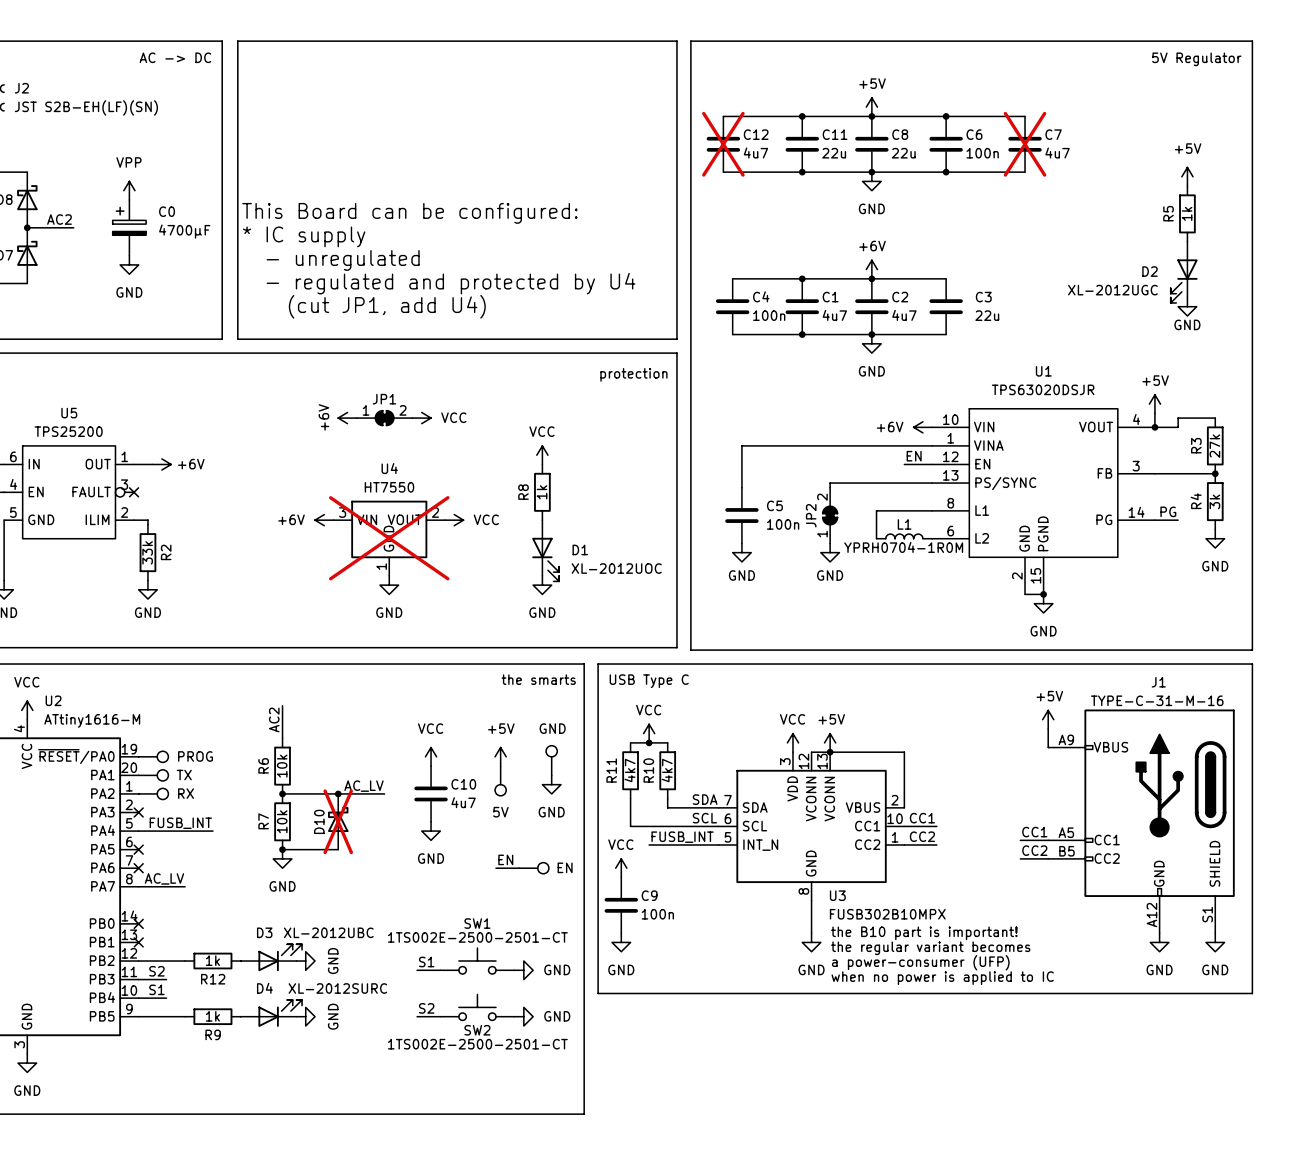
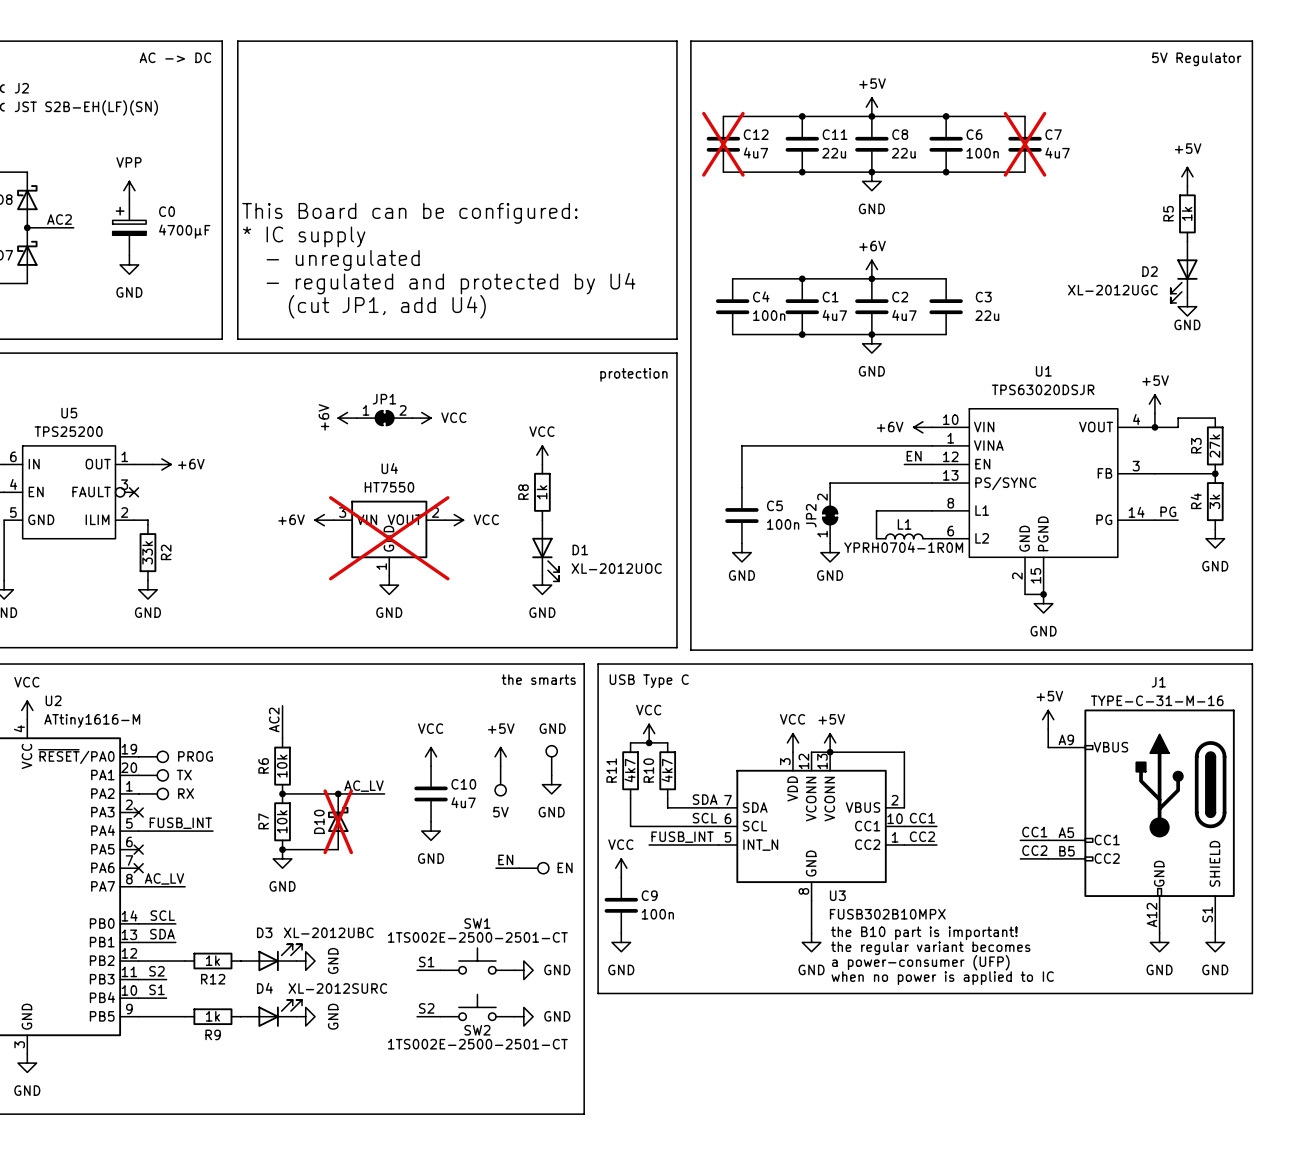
label: none -> SCL (162, 915)
wire: none -> (138, 923) (175, 923)
no-connect mark: (138, 923) -> none
label: none -> SDA (162, 934)
wire: none -> (138, 942) (175, 942)
no-connect mark: (138, 942) -> none

